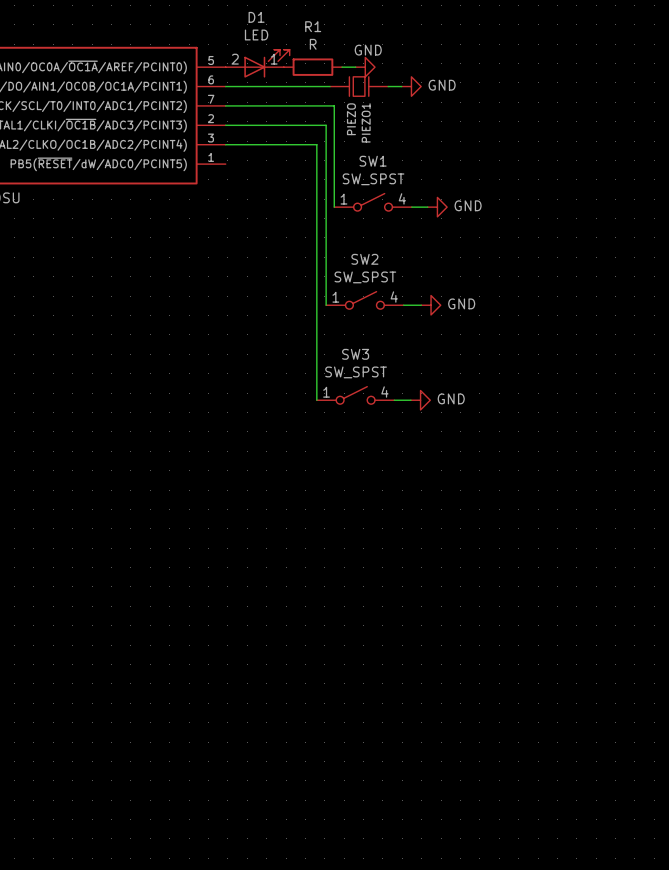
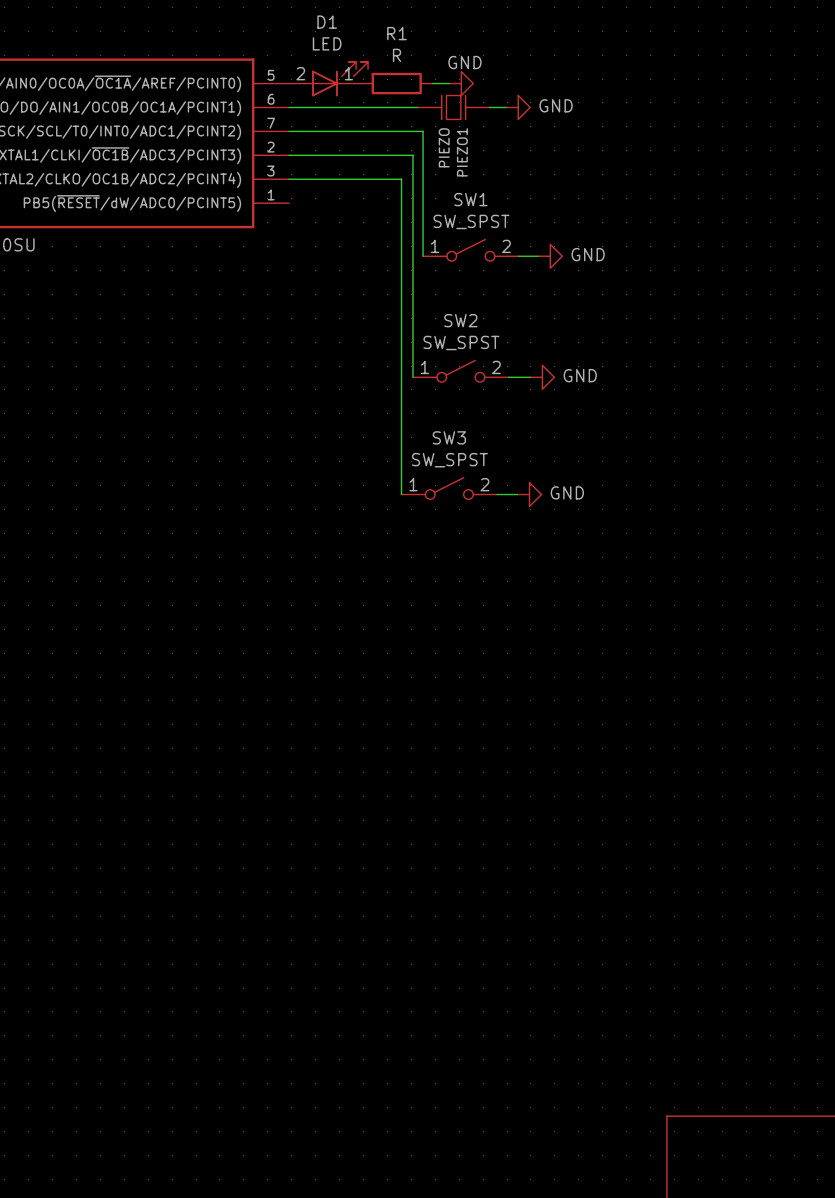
SW1 pin number: 4 (402, 198) -> 2 (506, 246)
SW2 pin number: 4 (394, 297) -> 2 (496, 367)
SW3 pin number: 4 (384, 392) -> 2 (484, 484)

